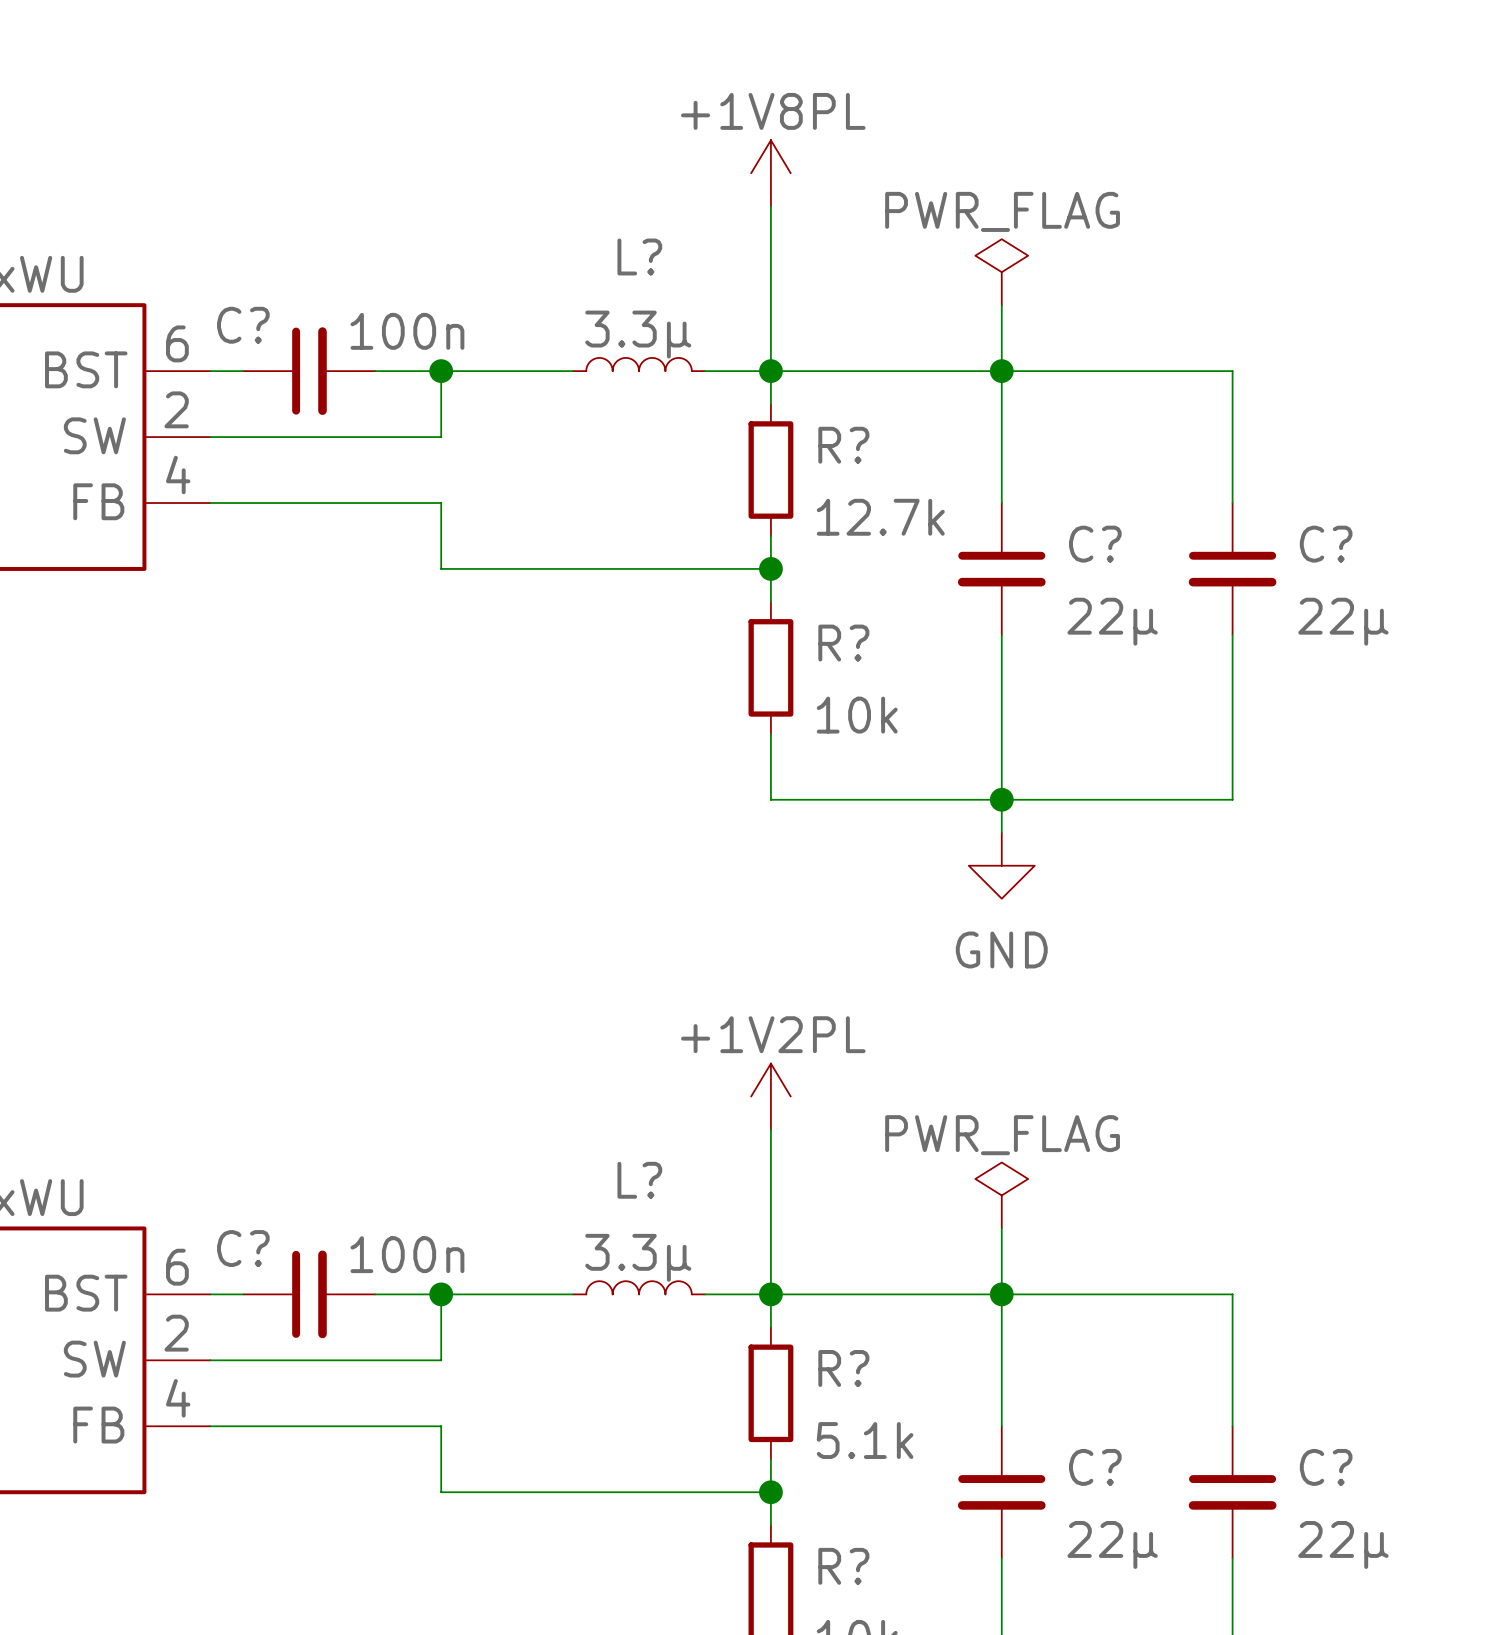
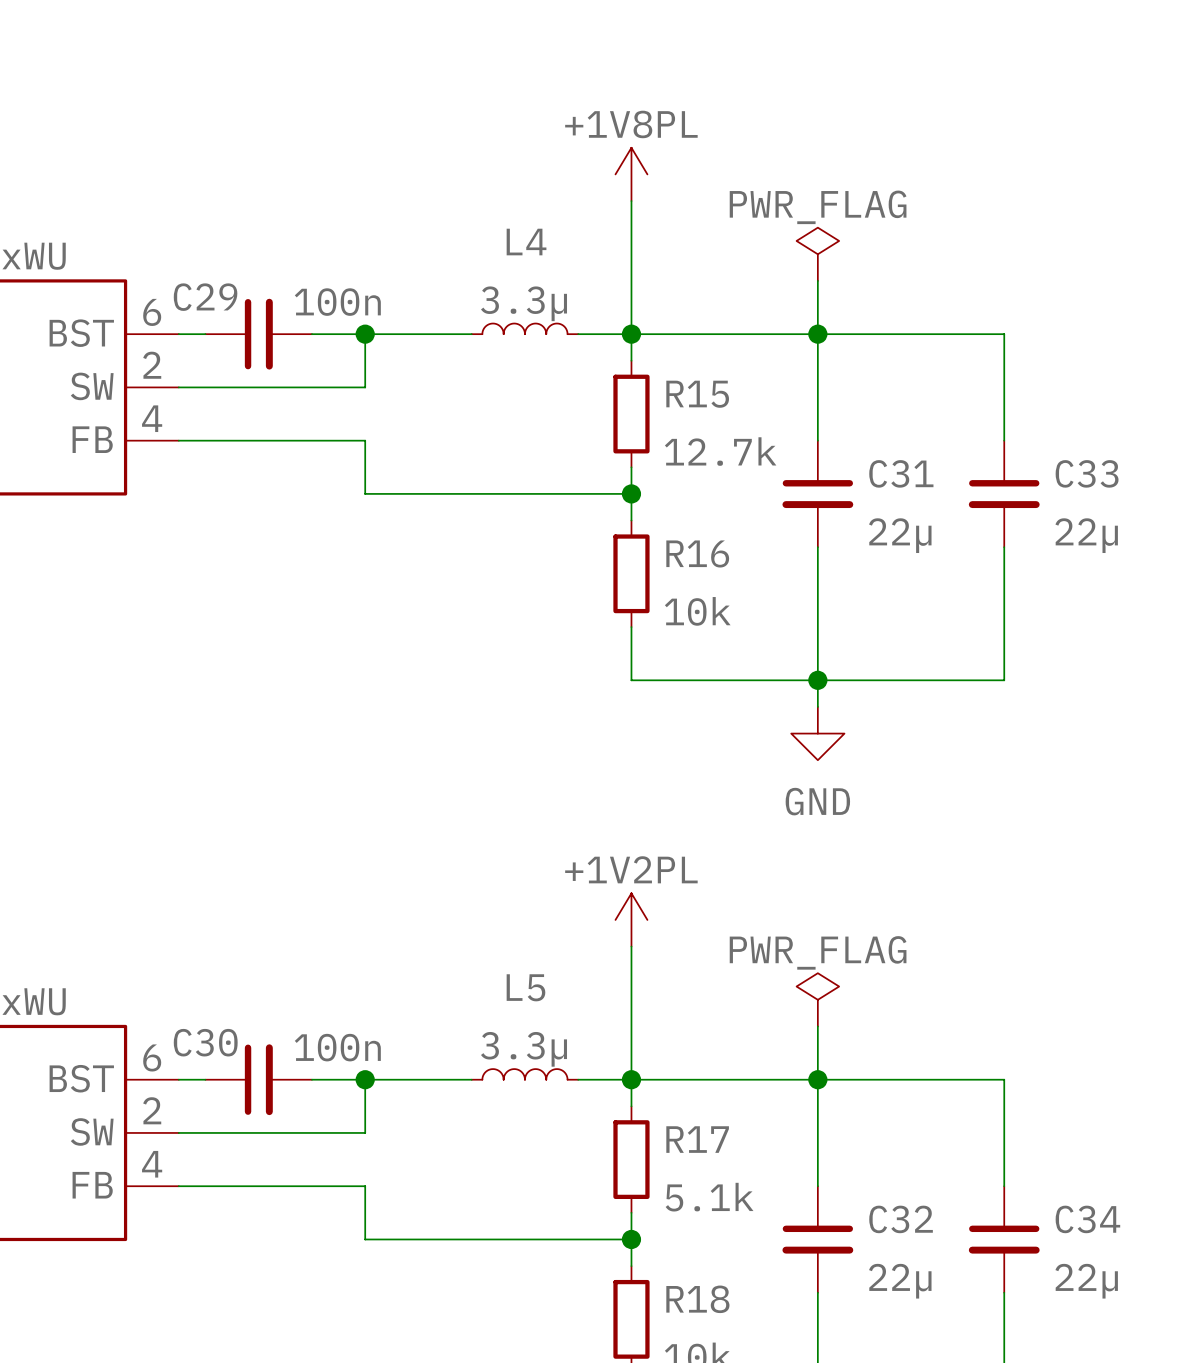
L? name: L? (639, 256) -> L4 (526, 242)
C? name: C? (243, 325) -> C29 (205, 297)
R? name: R? (843, 445) -> R15 (697, 394)
C? name: C? (1095, 544) -> C31 (901, 473)
C? name: C? (1326, 544) -> C33 (1087, 473)
R? name: R? (843, 643) -> R16 (697, 553)
L? name: L? (639, 1180) -> L5 (525, 987)
C? name: C? (243, 1248) -> C30 (205, 1042)
R? name: R? (843, 1368) -> R17 (697, 1139)
C? name: C? (1095, 1467) -> C32 (901, 1219)
C? name: C? (1326, 1467) -> C34 (1087, 1219)
R? name: R? (843, 1566) -> R18 (697, 1299)

